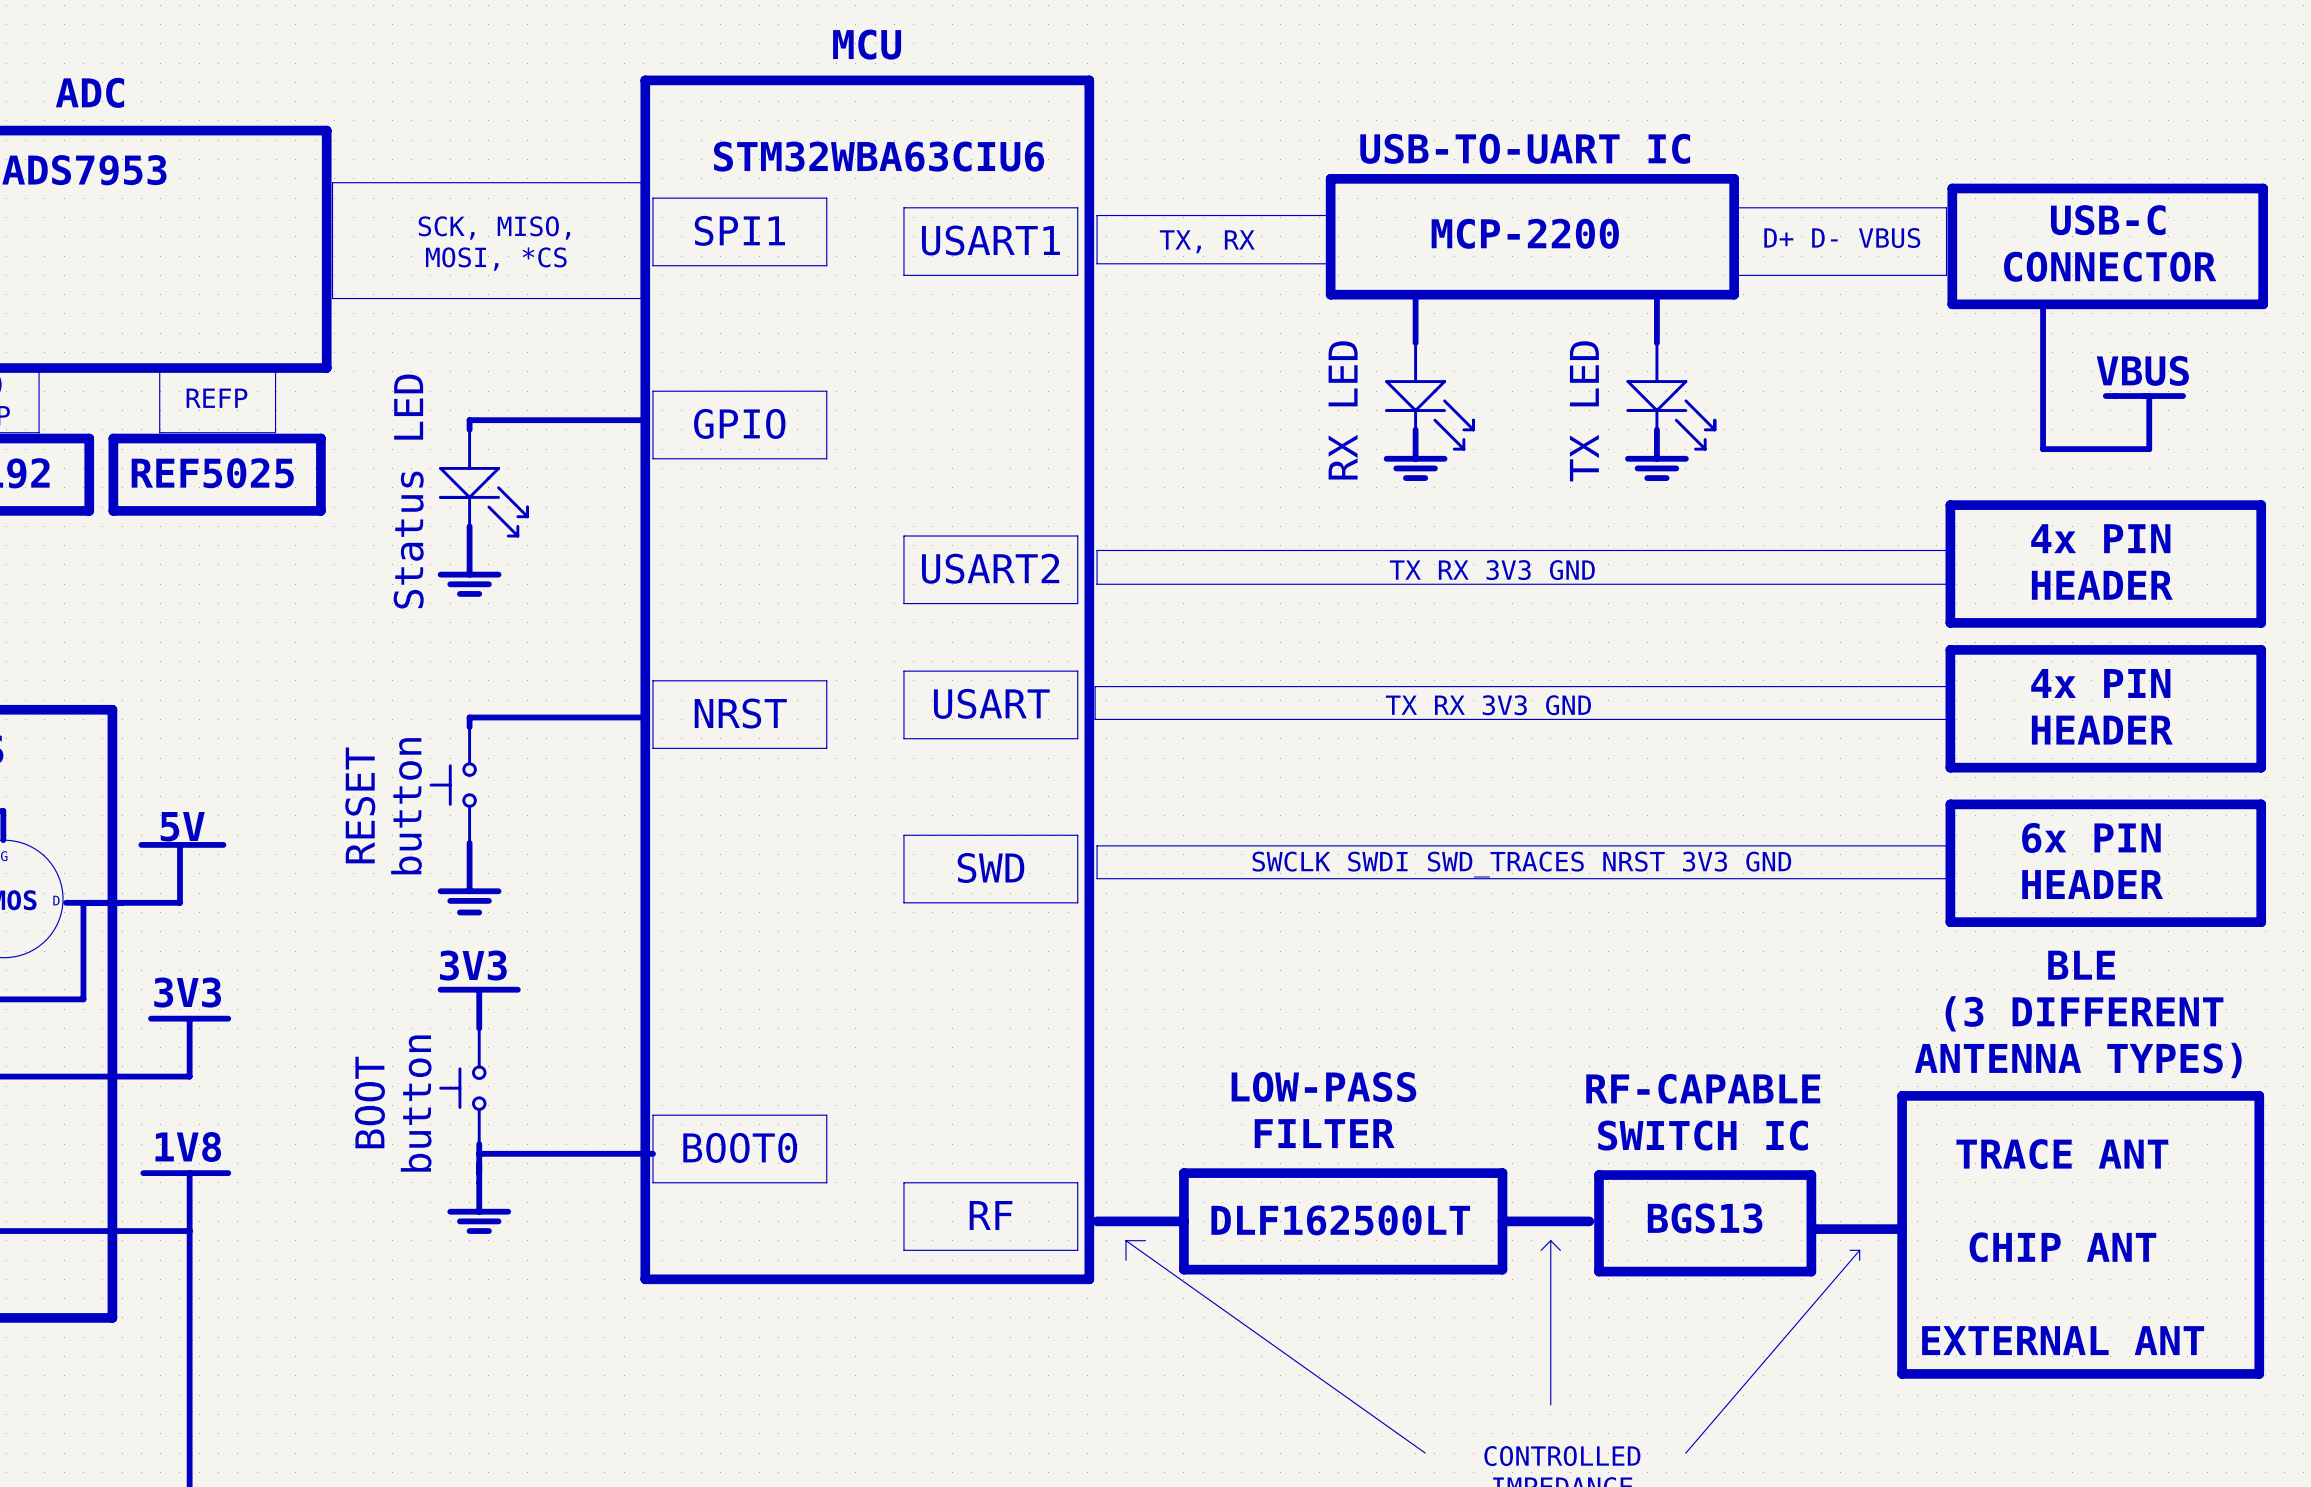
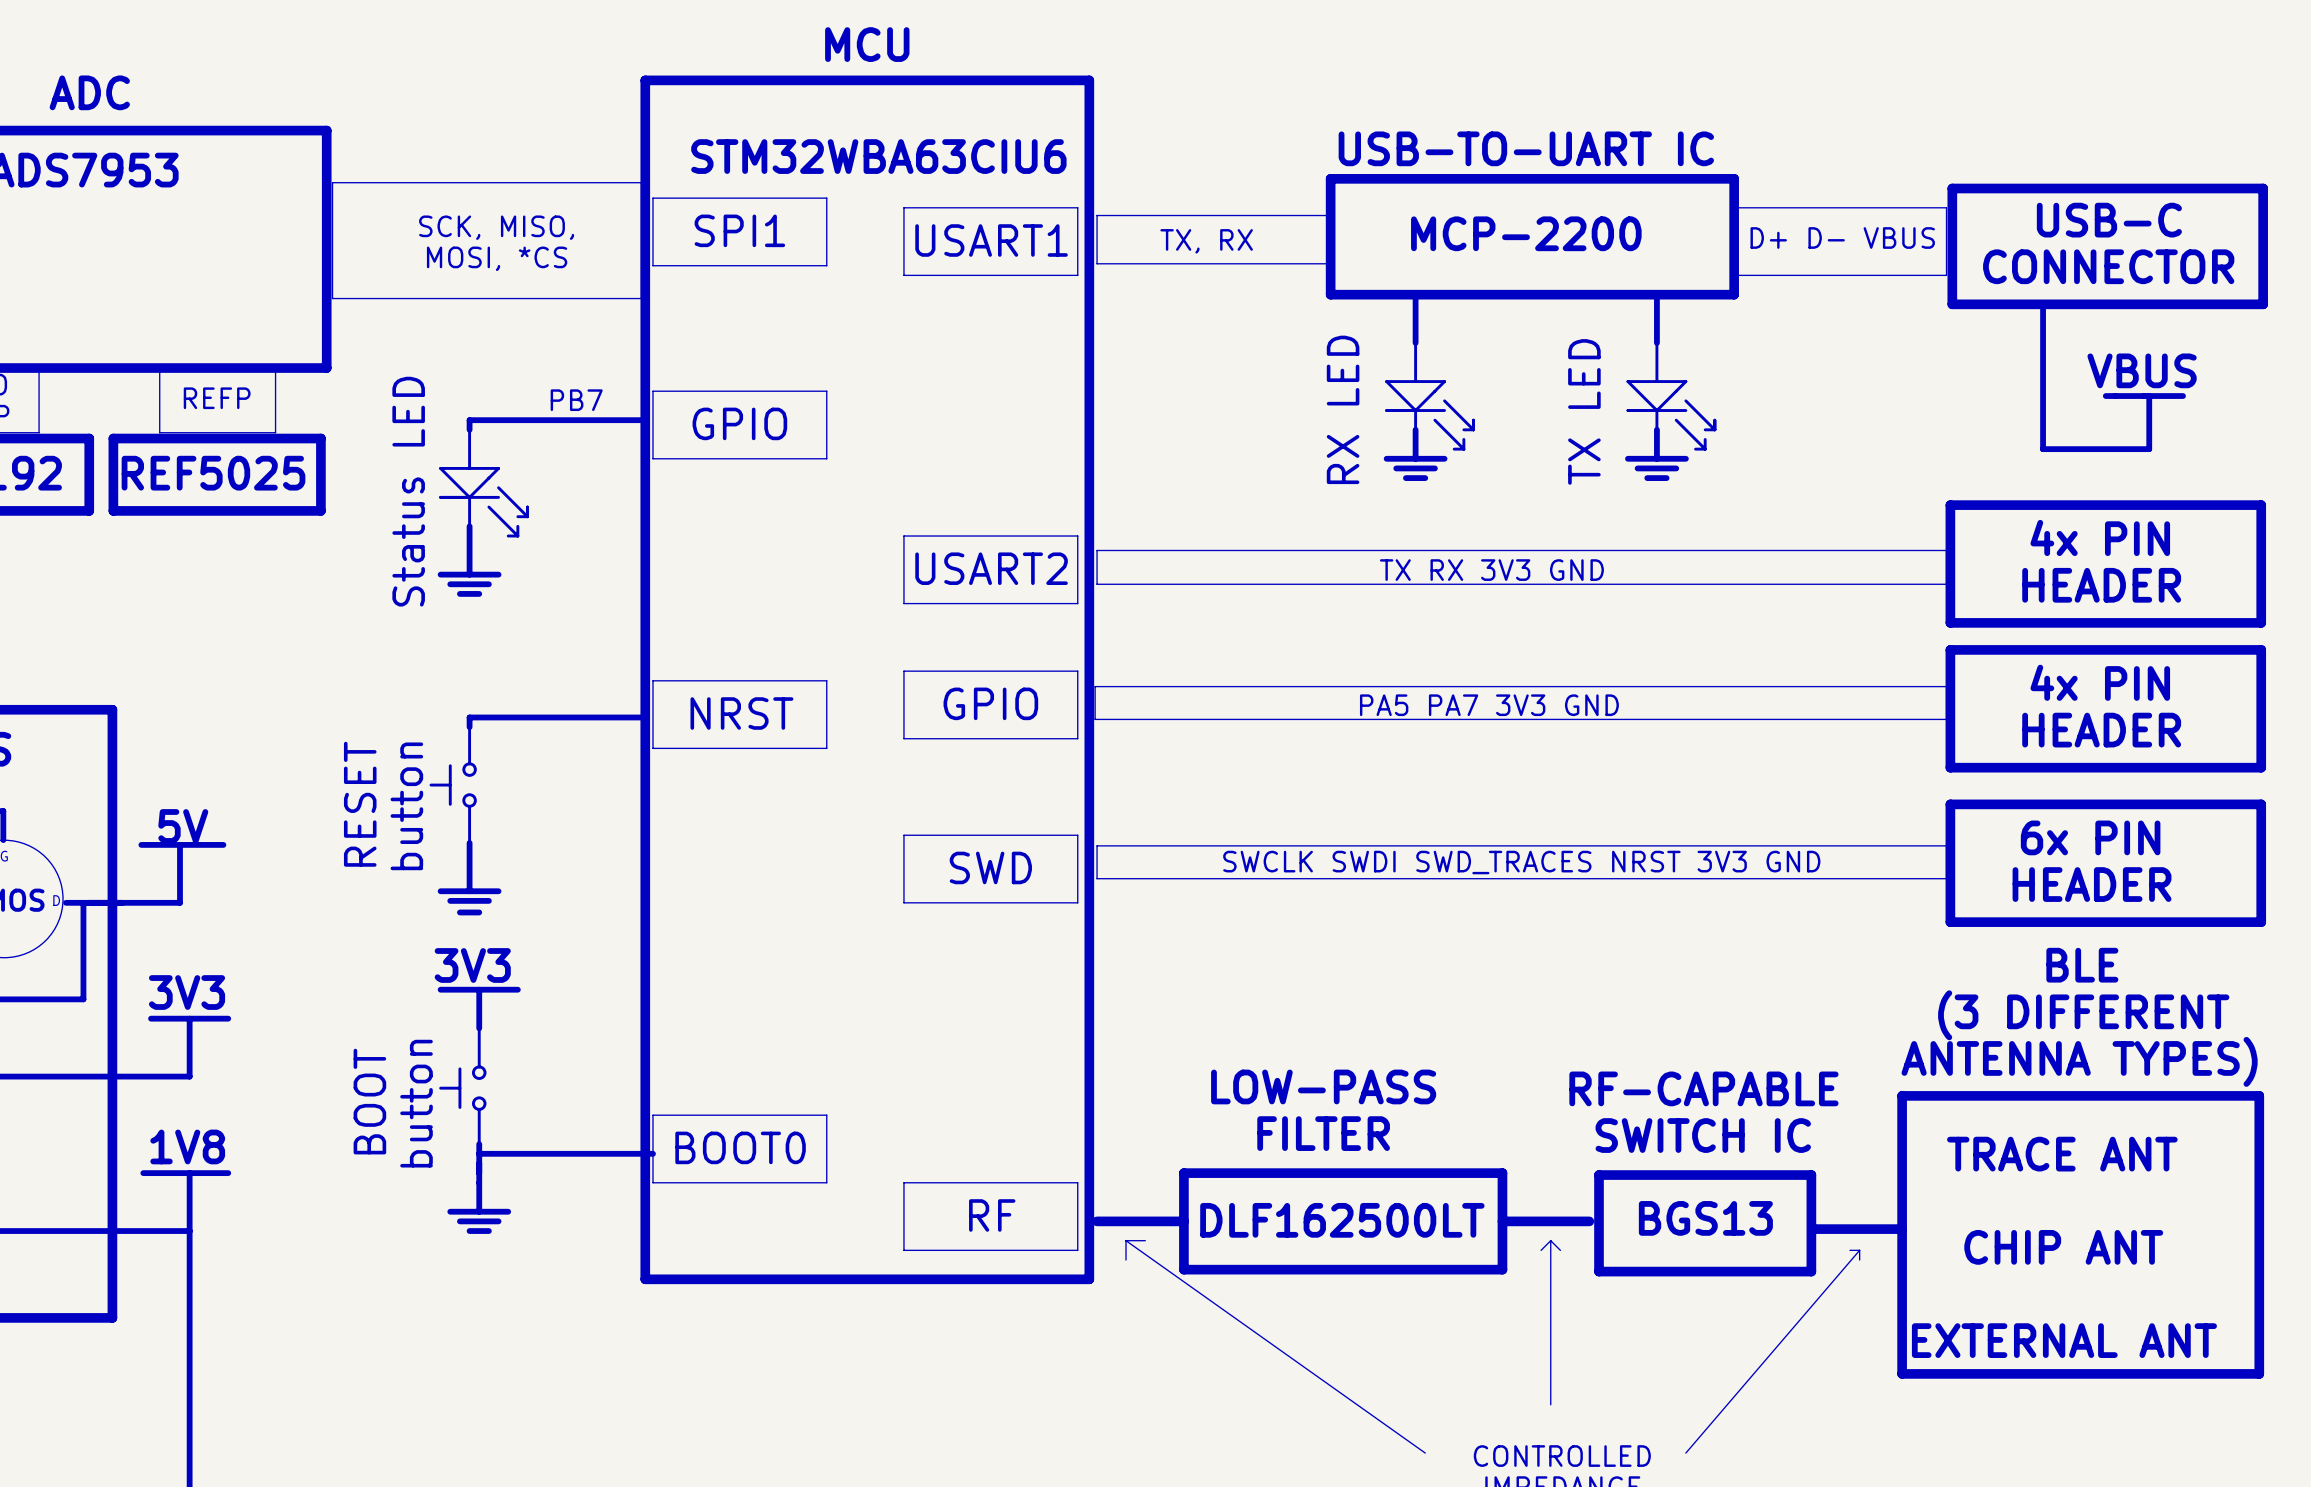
text: none -> PB7 (576, 400)
text: USART (991, 703) -> GPIO (990, 703)
text: TX RX 3V3 GND (1488, 705) -> PA5 PA7 3V3 GND (1489, 705)

